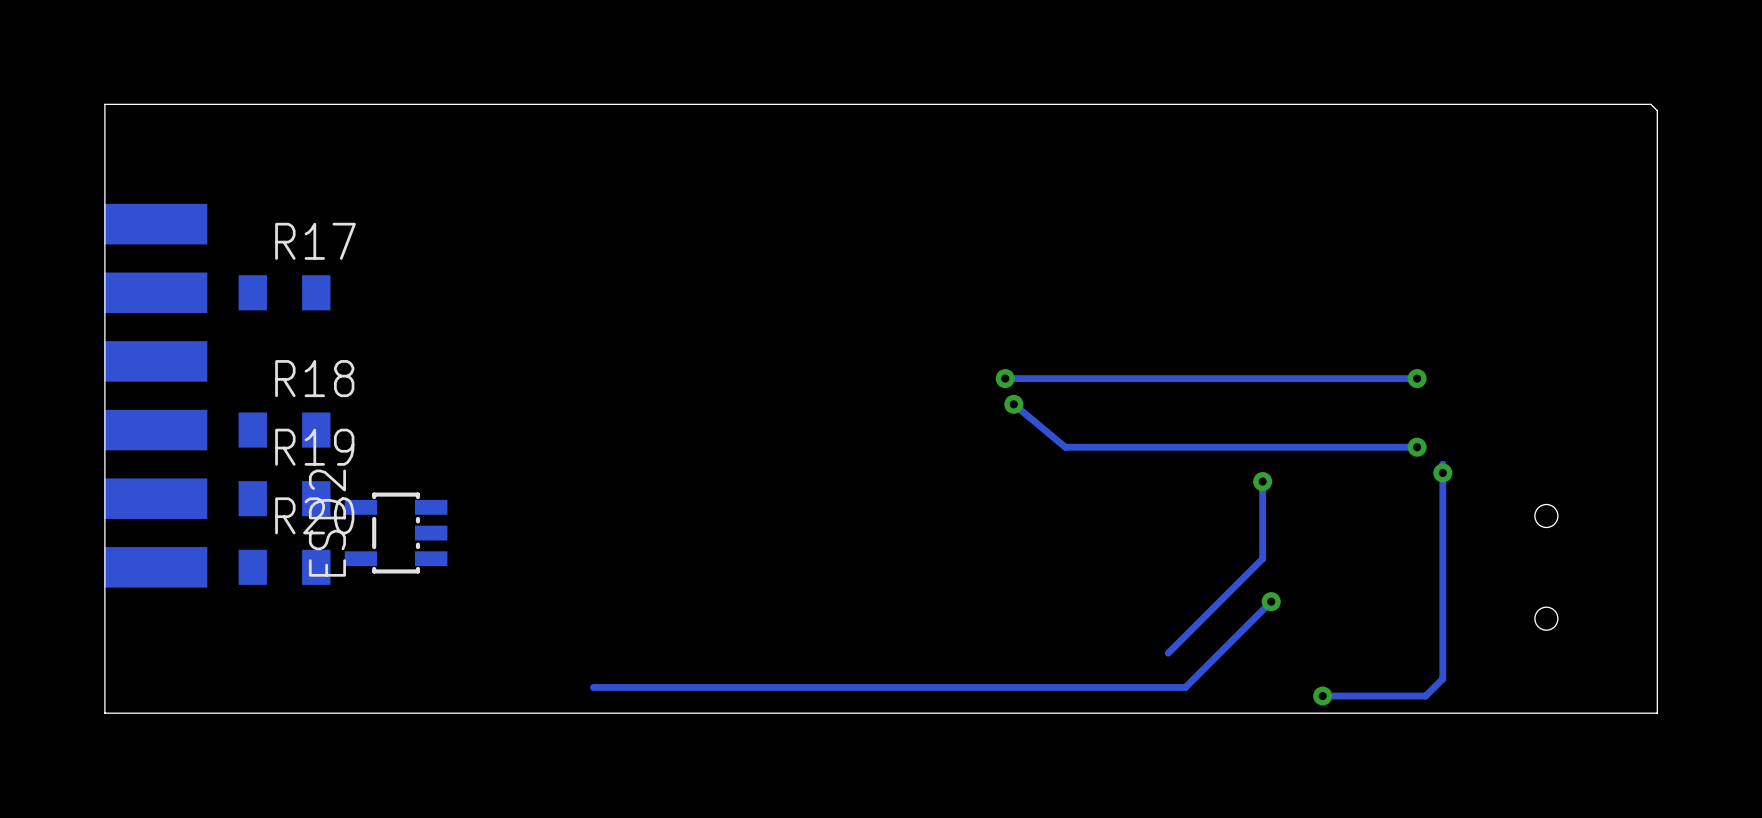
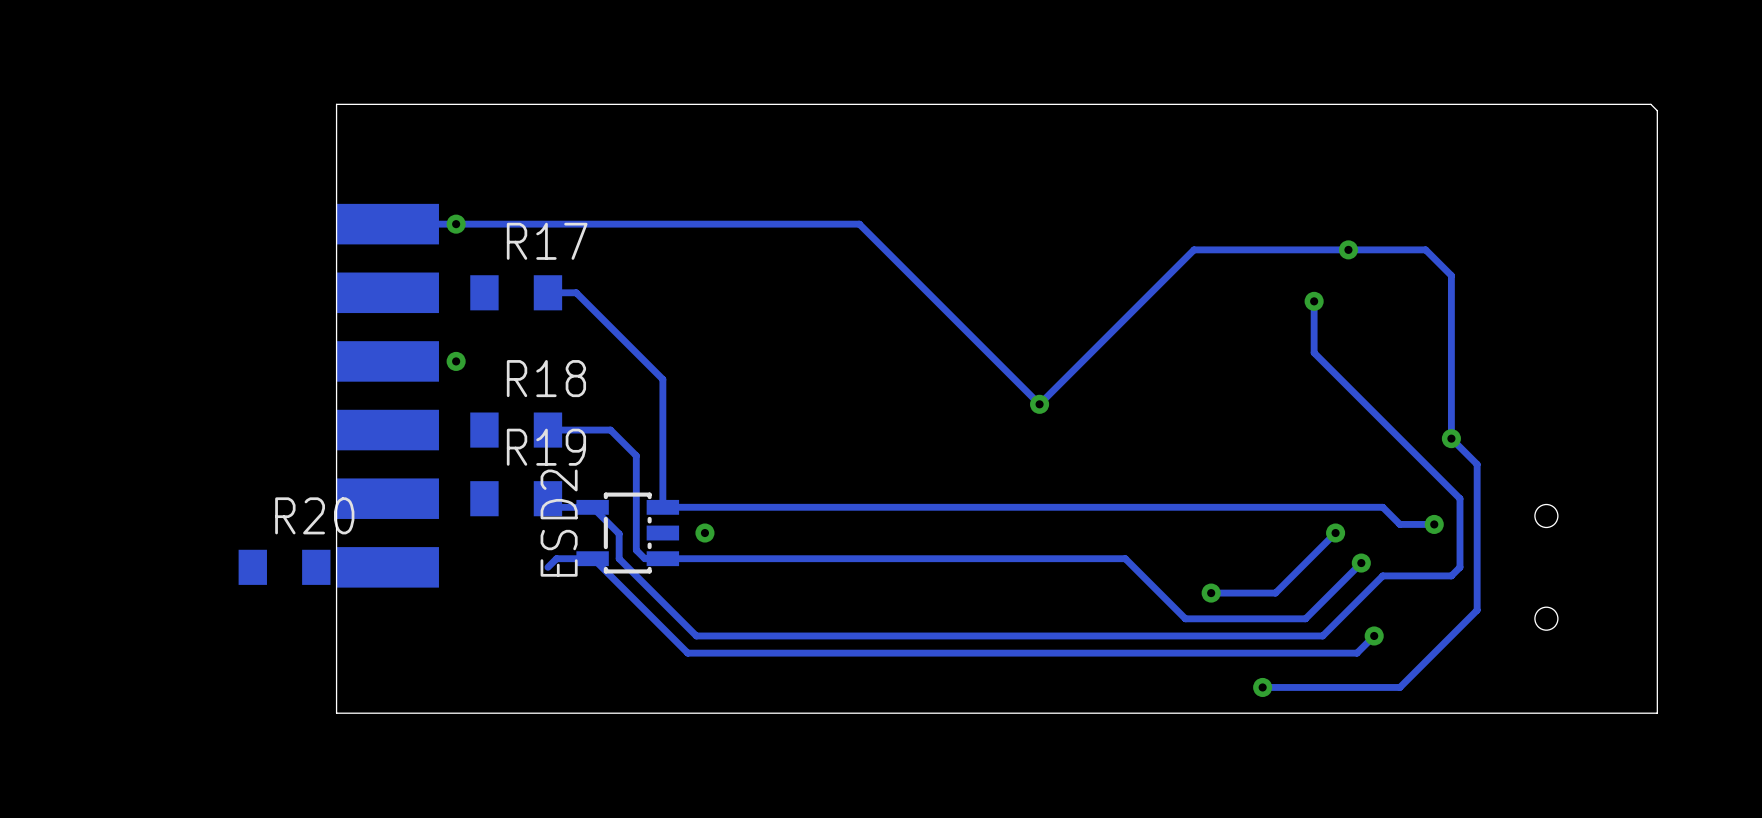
board edge: (336, 104) (104, 104) (104, 713) (336, 713) -> (336, 104) (336, 713)
track: none -> (387, 224) (859, 224) (1039, 404) (1194, 249) (1425, 249) (1451, 275) (1451, 438) (1477, 464) (1477, 610) (1399, 687) (1262, 687)
via: none -> (456, 224)
via: none -> (1348, 249)
R17 position: (284, 292) -> (516, 292)
track: none -> (547, 292) (576, 292) (662, 379) (662, 507) (1382, 507) (1399, 524) (1434, 524)
track: none -> (1314, 301) (1314, 352) (1459, 498) (1459, 567) (1451, 575) (1382, 575) (1322, 635) (696, 635) (619, 558) (619, 533) (592, 507) (556, 507) (547, 498)
via: none -> (1314, 301)
via: none -> (456, 361)
via: (1005, 378) -> none
track: (1417, 378) (1005, 378) -> none
via: (1417, 378) -> none
part position: (155, 395) -> (387, 395)
track: (1013, 404) (1065, 447) (1417, 447) -> none
via: (1013, 404) -> none
via: none -> (1039, 404)
R18 position: (284, 430) -> (516, 430)
track: none -> (547, 430) (610, 430) (636, 455) (636, 550) (644, 558) (1125, 558) (1185, 618) (1305, 618) (1361, 563)
via: none -> (1451, 438)
via: (1417, 447) -> none
track: (1442, 464) (1442, 678) (1425, 696) (1322, 696) -> none
via: (1442, 472) -> none
track: (1262, 481) (1262, 558) (1168, 653) -> none
via: (1262, 481) -> none
R19 position: (284, 498) -> (516, 498)
via: none -> (1434, 524)
ESD2 position: (396, 533) -> (627, 533)
via: none -> (704, 533)
track: none -> (1335, 533) (1275, 593) (1211, 593)
via: none -> (1335, 533)
via: none -> (1361, 563)
track: none -> (547, 567) (556, 558) (593, 558) (687, 653) (1357, 653) (1374, 635)
via: none -> (1211, 593)
track: (1271, 601) (1185, 687) (593, 687) -> none
via: (1271, 601) -> none
via: none -> (1374, 635)
via: none -> (1262, 687)
via: (1322, 696) -> none

